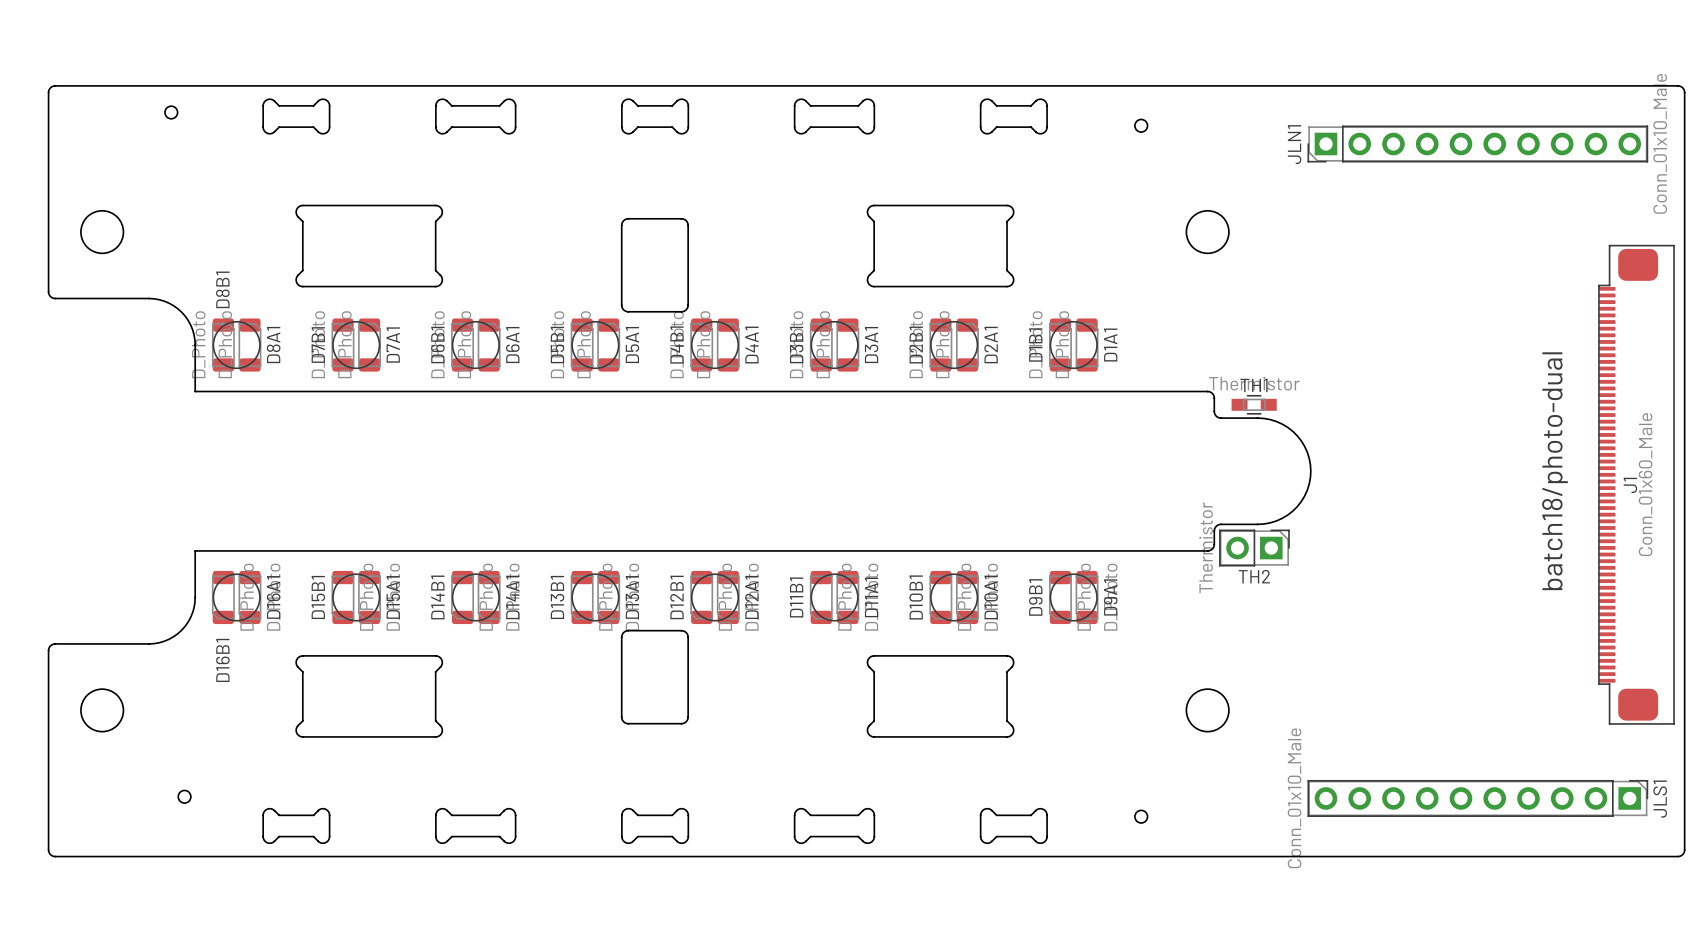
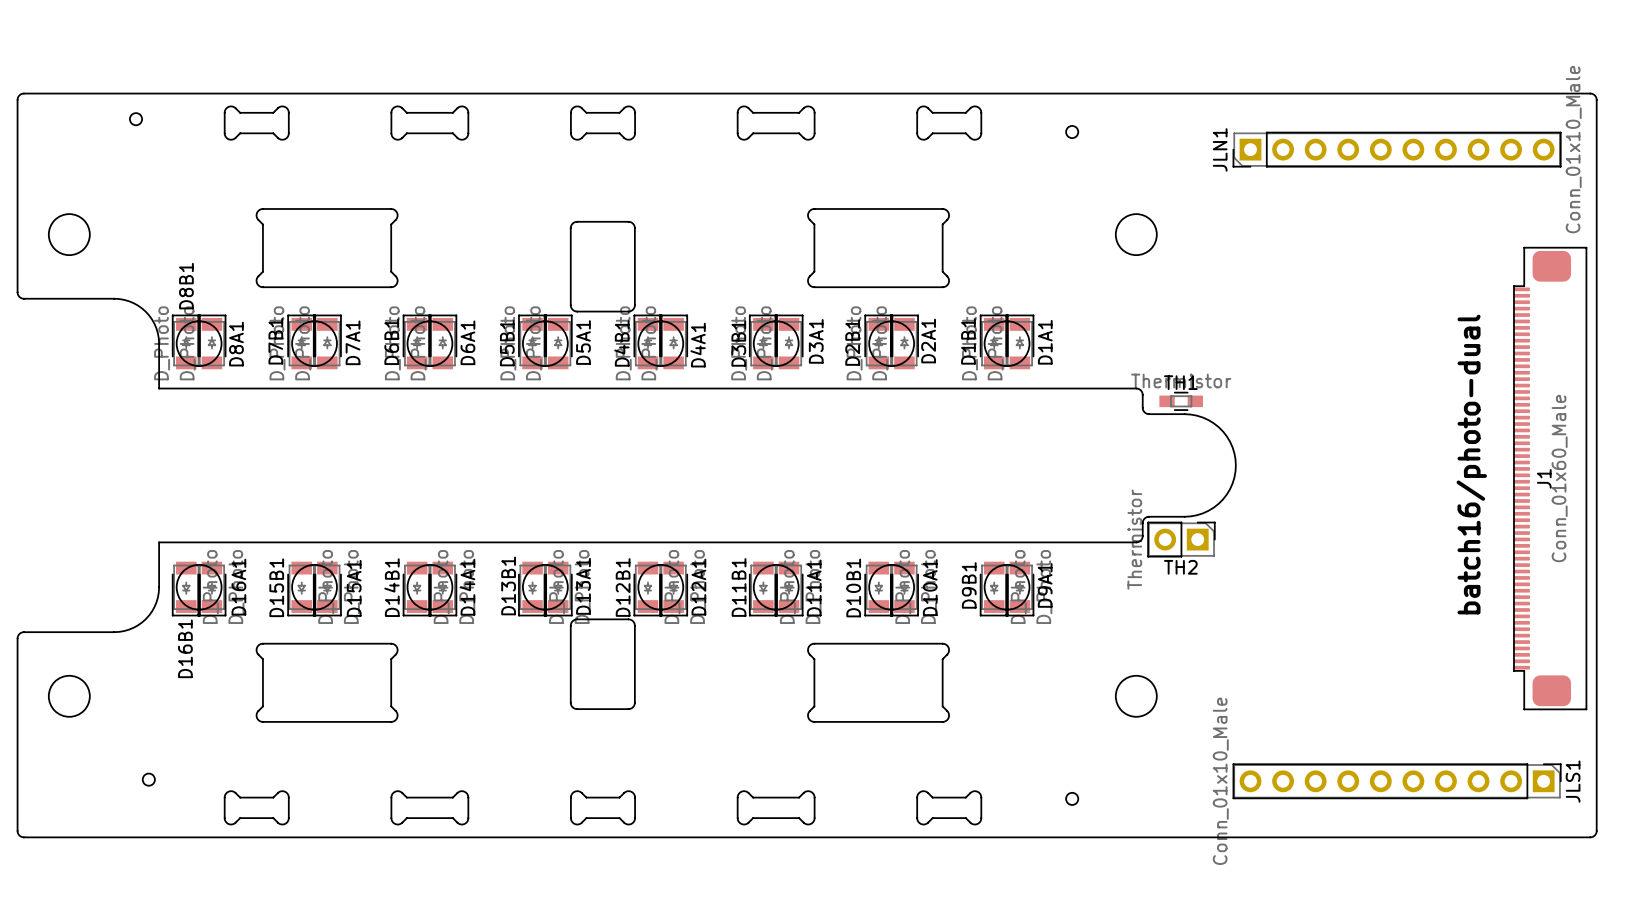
D8B1 footprint: [212, 318, 235, 372] -> [171, 314, 201, 370]
D8A1 footprint: [238, 318, 262, 372] -> [197, 314, 227, 370]
D7B1 footprint: [331, 318, 355, 372] -> [287, 314, 317, 370]
D7A1 footprint: [358, 318, 381, 372] -> [313, 314, 342, 370]
D6B1 footprint: [451, 318, 474, 372] -> [402, 314, 432, 370]
D6A1 footprint: [477, 318, 501, 372] -> [428, 314, 458, 370]
D5B1 footprint: [570, 318, 594, 372] -> [518, 314, 547, 370]
D5A1 footprint: [597, 318, 620, 372] -> [543, 314, 573, 370]
D4B1 footprint: [690, 318, 714, 372] -> [633, 314, 663, 370]
D4A1 footprint: [716, 318, 740, 372] -> [659, 314, 688, 370]
D3B1 footprint: [810, 318, 833, 372] -> [749, 314, 778, 370]
D3A1 footprint: [836, 318, 860, 372] -> [774, 314, 804, 370]
D2B1 footprint: [929, 318, 953, 372] -> [864, 314, 894, 370]
D2A1 footprint: [956, 318, 979, 372] -> [890, 314, 919, 370]
D1B1 footprint: [1049, 318, 1072, 372] -> [979, 314, 1009, 370]
D1A1 footprint: [1075, 318, 1099, 372] -> [1005, 314, 1035, 370]
text: batch18/photo-dual (1554, 471) -> batch16/photo-dual (1471, 464)
D16B1 footprint: [212, 570, 235, 625] -> [171, 561, 201, 617]
D16A1 footprint: [238, 570, 262, 625] -> [197, 561, 227, 617]
D15B1 footprint: [331, 570, 355, 625] -> [287, 561, 317, 617]
D15A1 footprint: [358, 570, 381, 625] -> [313, 561, 342, 617]
D14B1 footprint: [451, 570, 474, 625] -> [402, 561, 432, 617]
D14A1 footprint: [477, 570, 501, 625] -> [428, 561, 458, 617]
D13B1 footprint: [570, 570, 594, 625] -> [518, 561, 547, 617]
D13A1 footprint: [597, 570, 620, 625] -> [543, 561, 573, 617]
D12B1 footprint: [690, 570, 714, 625] -> [633, 561, 663, 617]
D12A1 footprint: [716, 570, 740, 625] -> [659, 561, 688, 617]
D11B1 footprint: [810, 570, 833, 625] -> [749, 561, 778, 617]
D11A1 footprint: [836, 570, 860, 625] -> [774, 561, 804, 617]
D10B1 footprint: [929, 570, 953, 625] -> [864, 561, 894, 617]
D10A1 footprint: [956, 570, 979, 625] -> [890, 561, 919, 617]
D9B1 footprint: [1049, 570, 1072, 625] -> [979, 561, 1009, 617]
D9A1 footprint: [1075, 570, 1099, 625] -> [1005, 561, 1035, 617]

